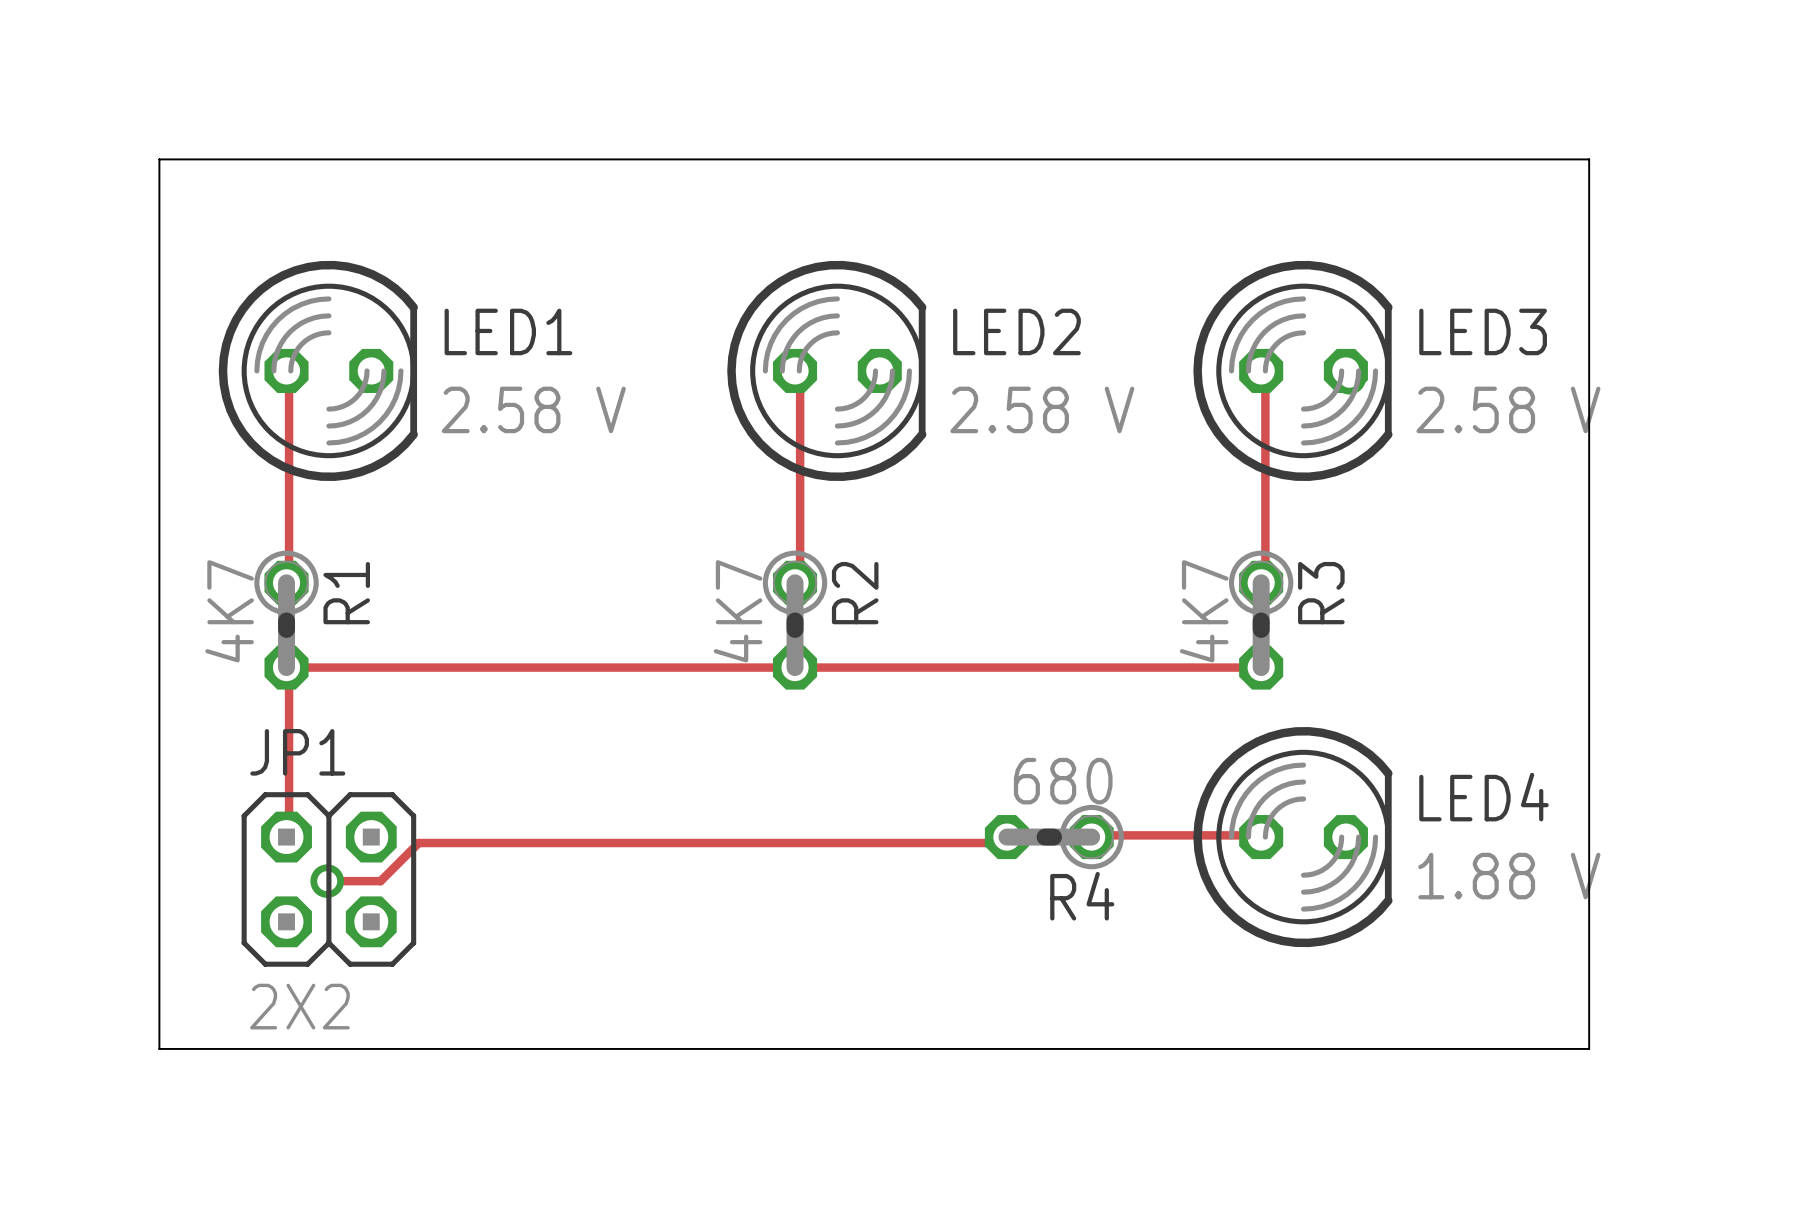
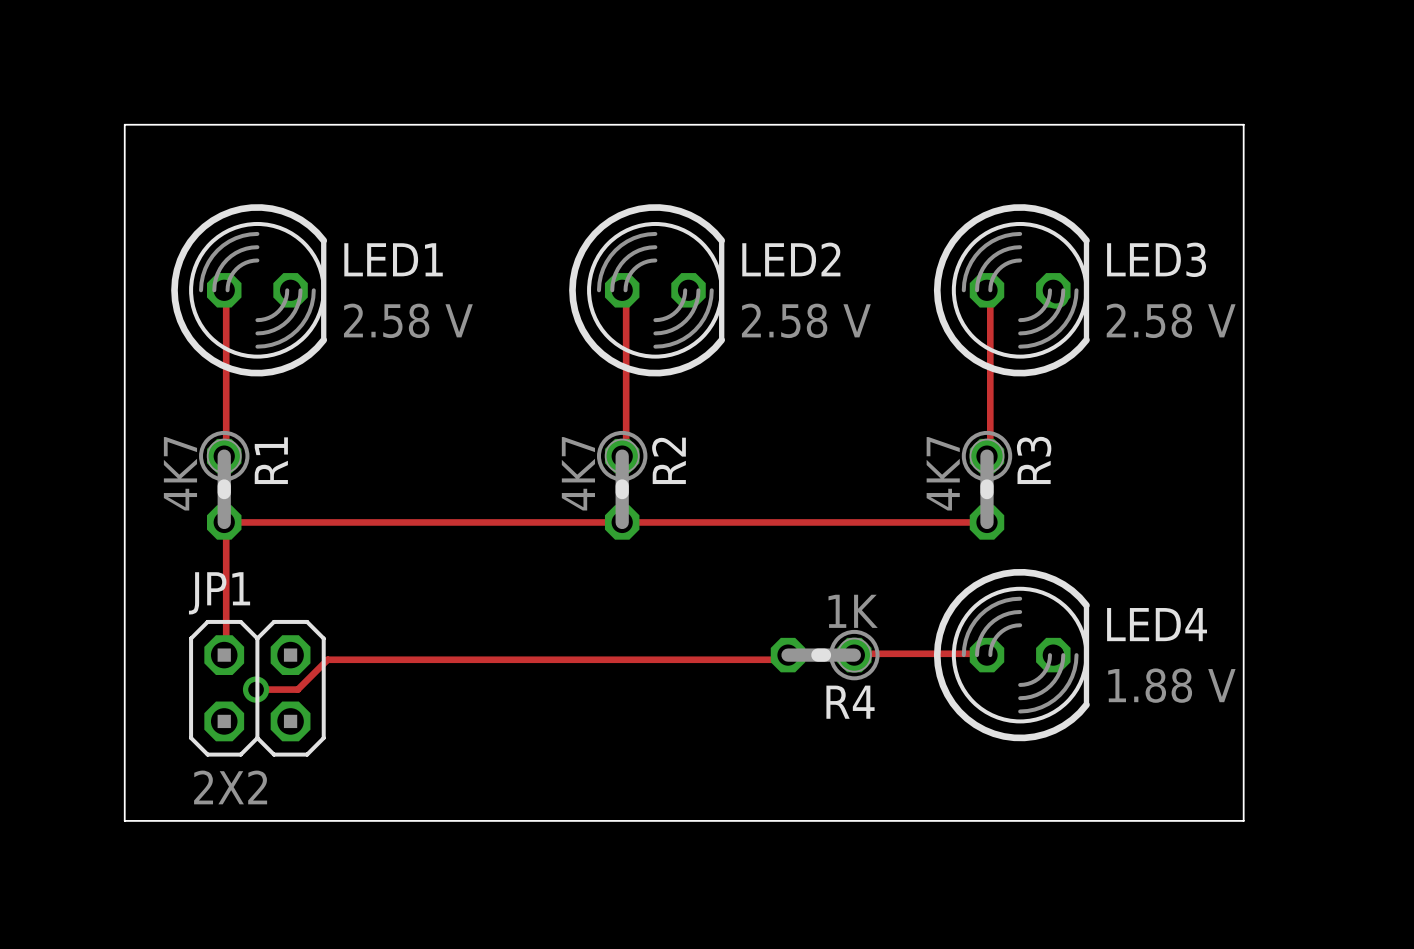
R4 value: 680 (1063, 781) -> 1K (853, 611)

